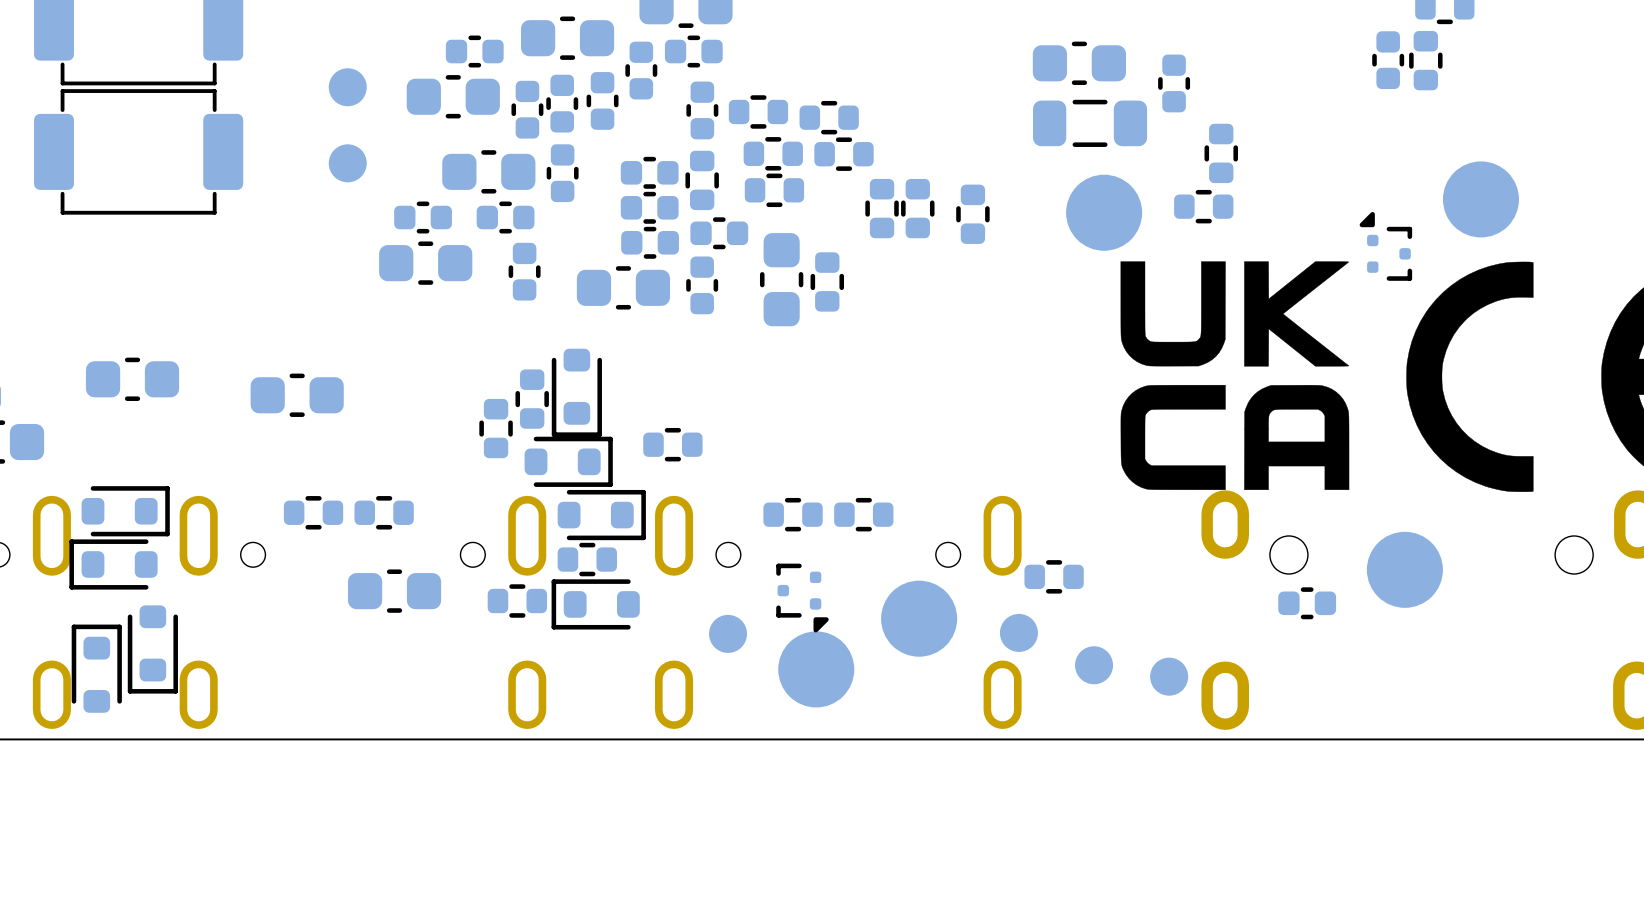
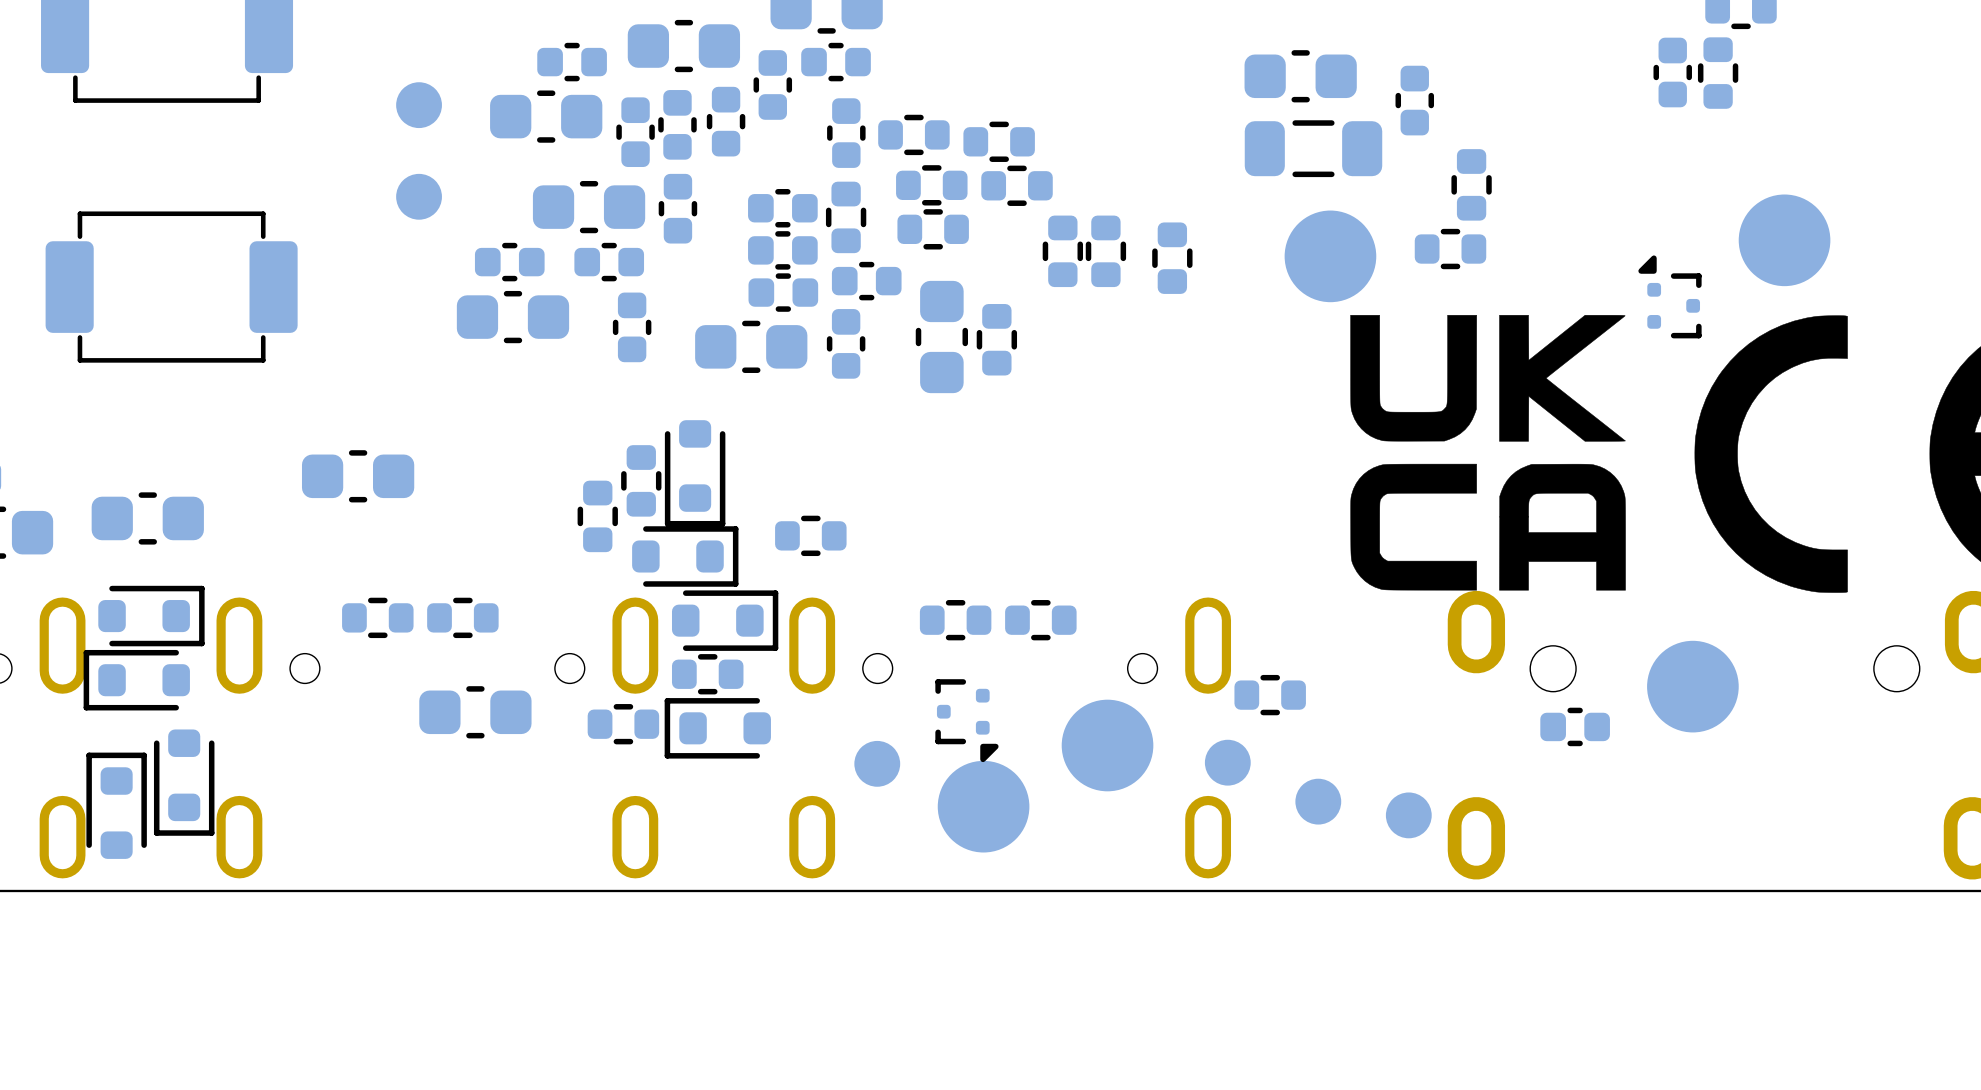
part position: (138, 151) -> (171, 287)
part position: (132, 379) -> (147, 518)

